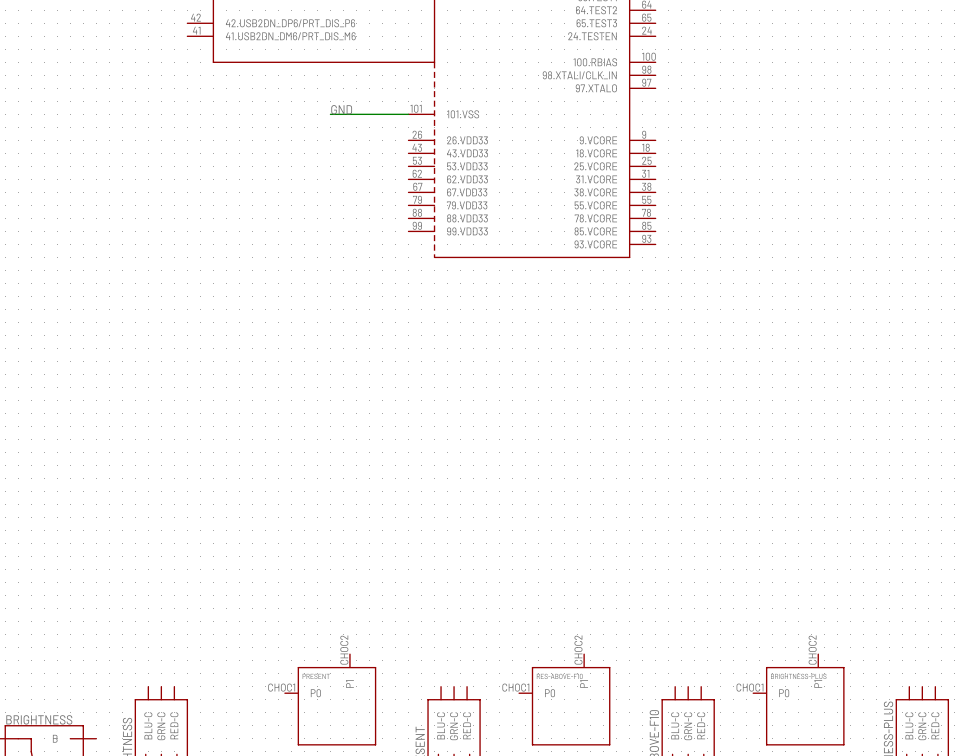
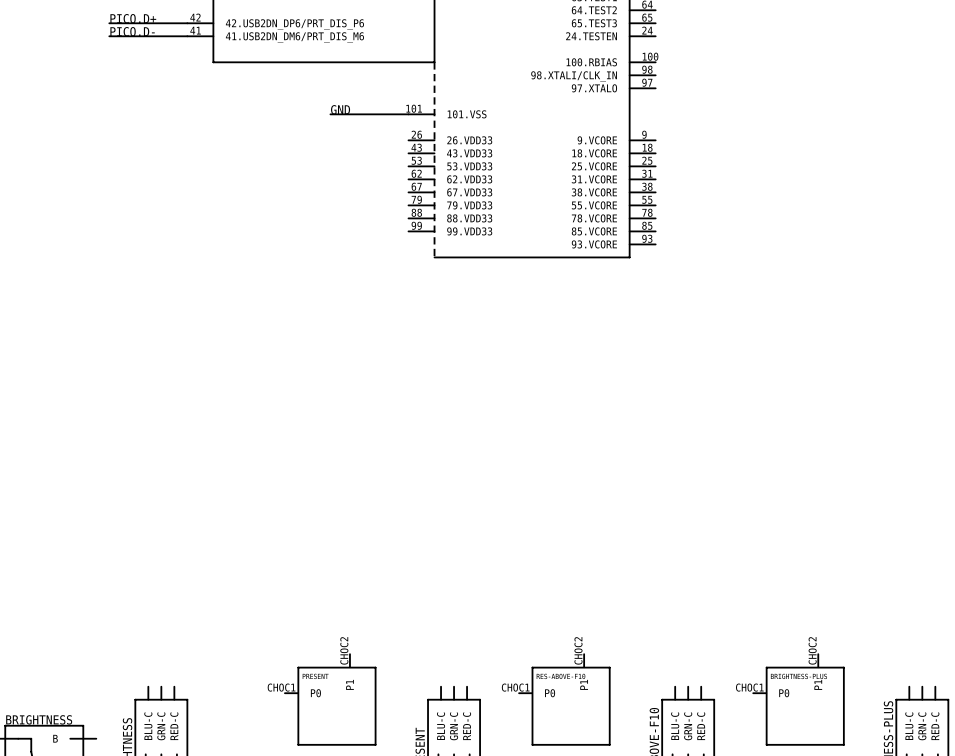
label: none -> PICO.D+ (133, 18)
wire: none -> (109, 23) (187, 23)
label: none -> PICO.D- (132, 31)
wire: none -> (109, 36) (187, 36)

